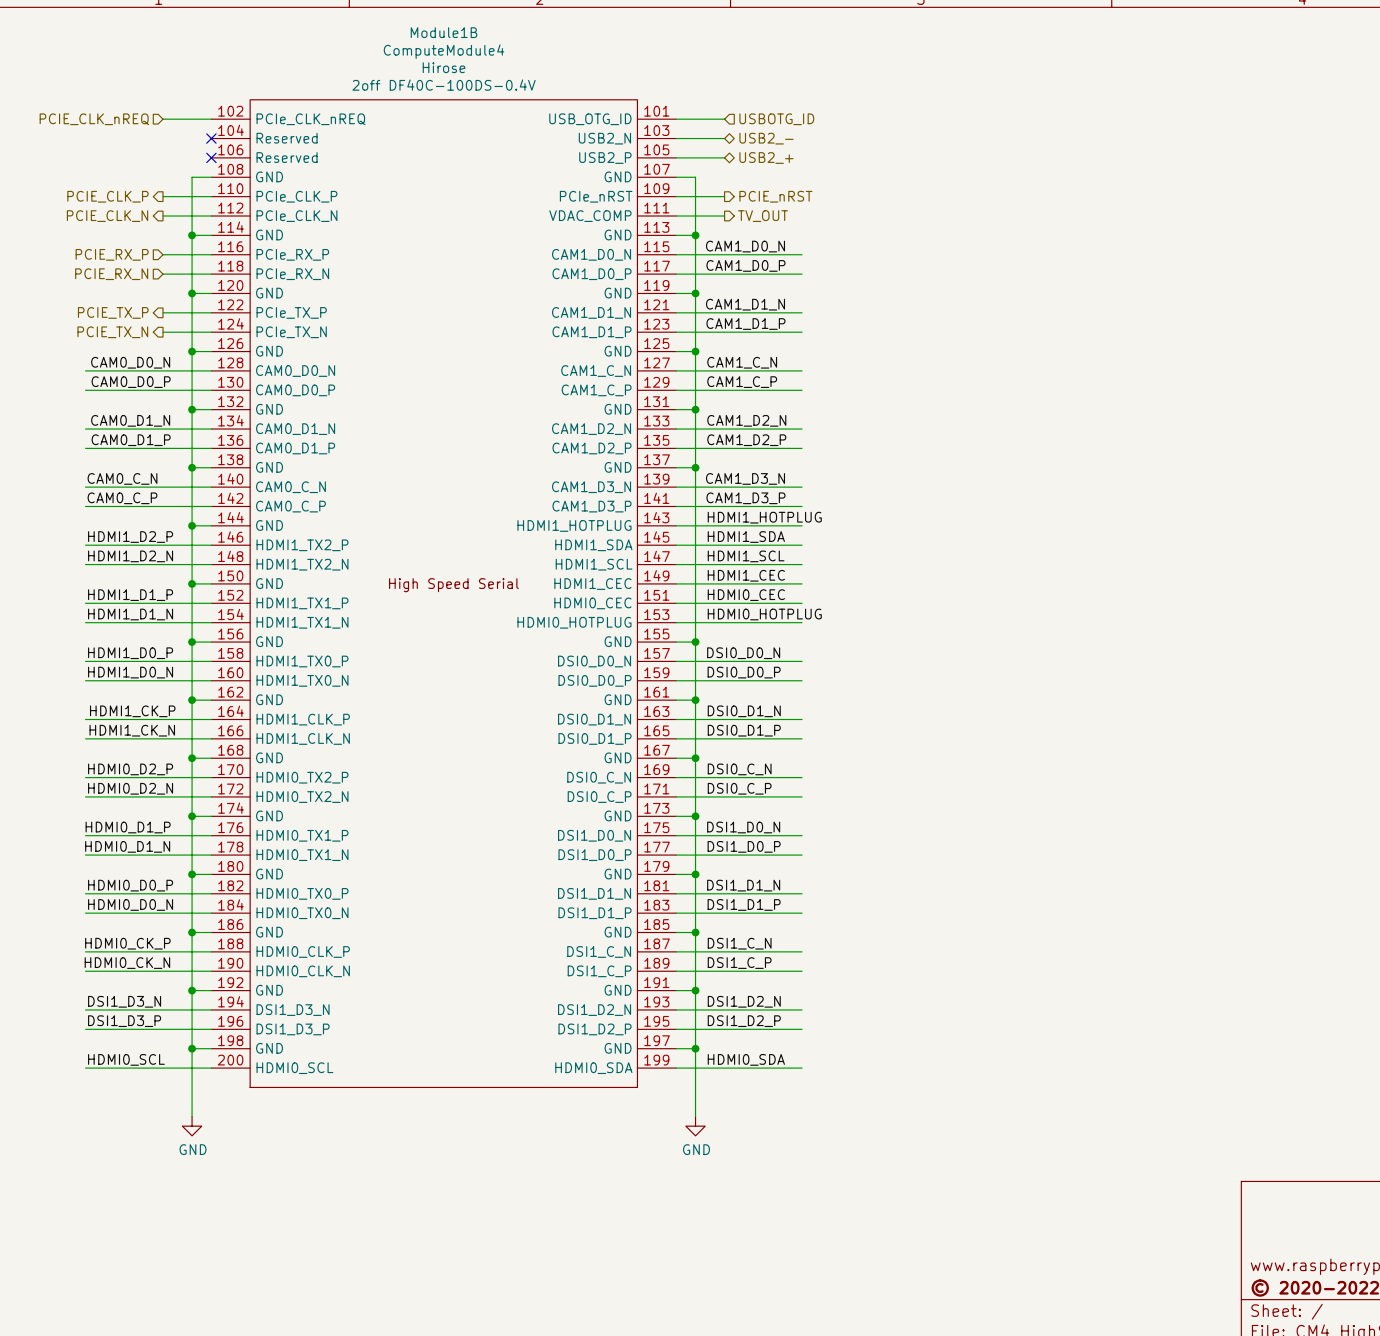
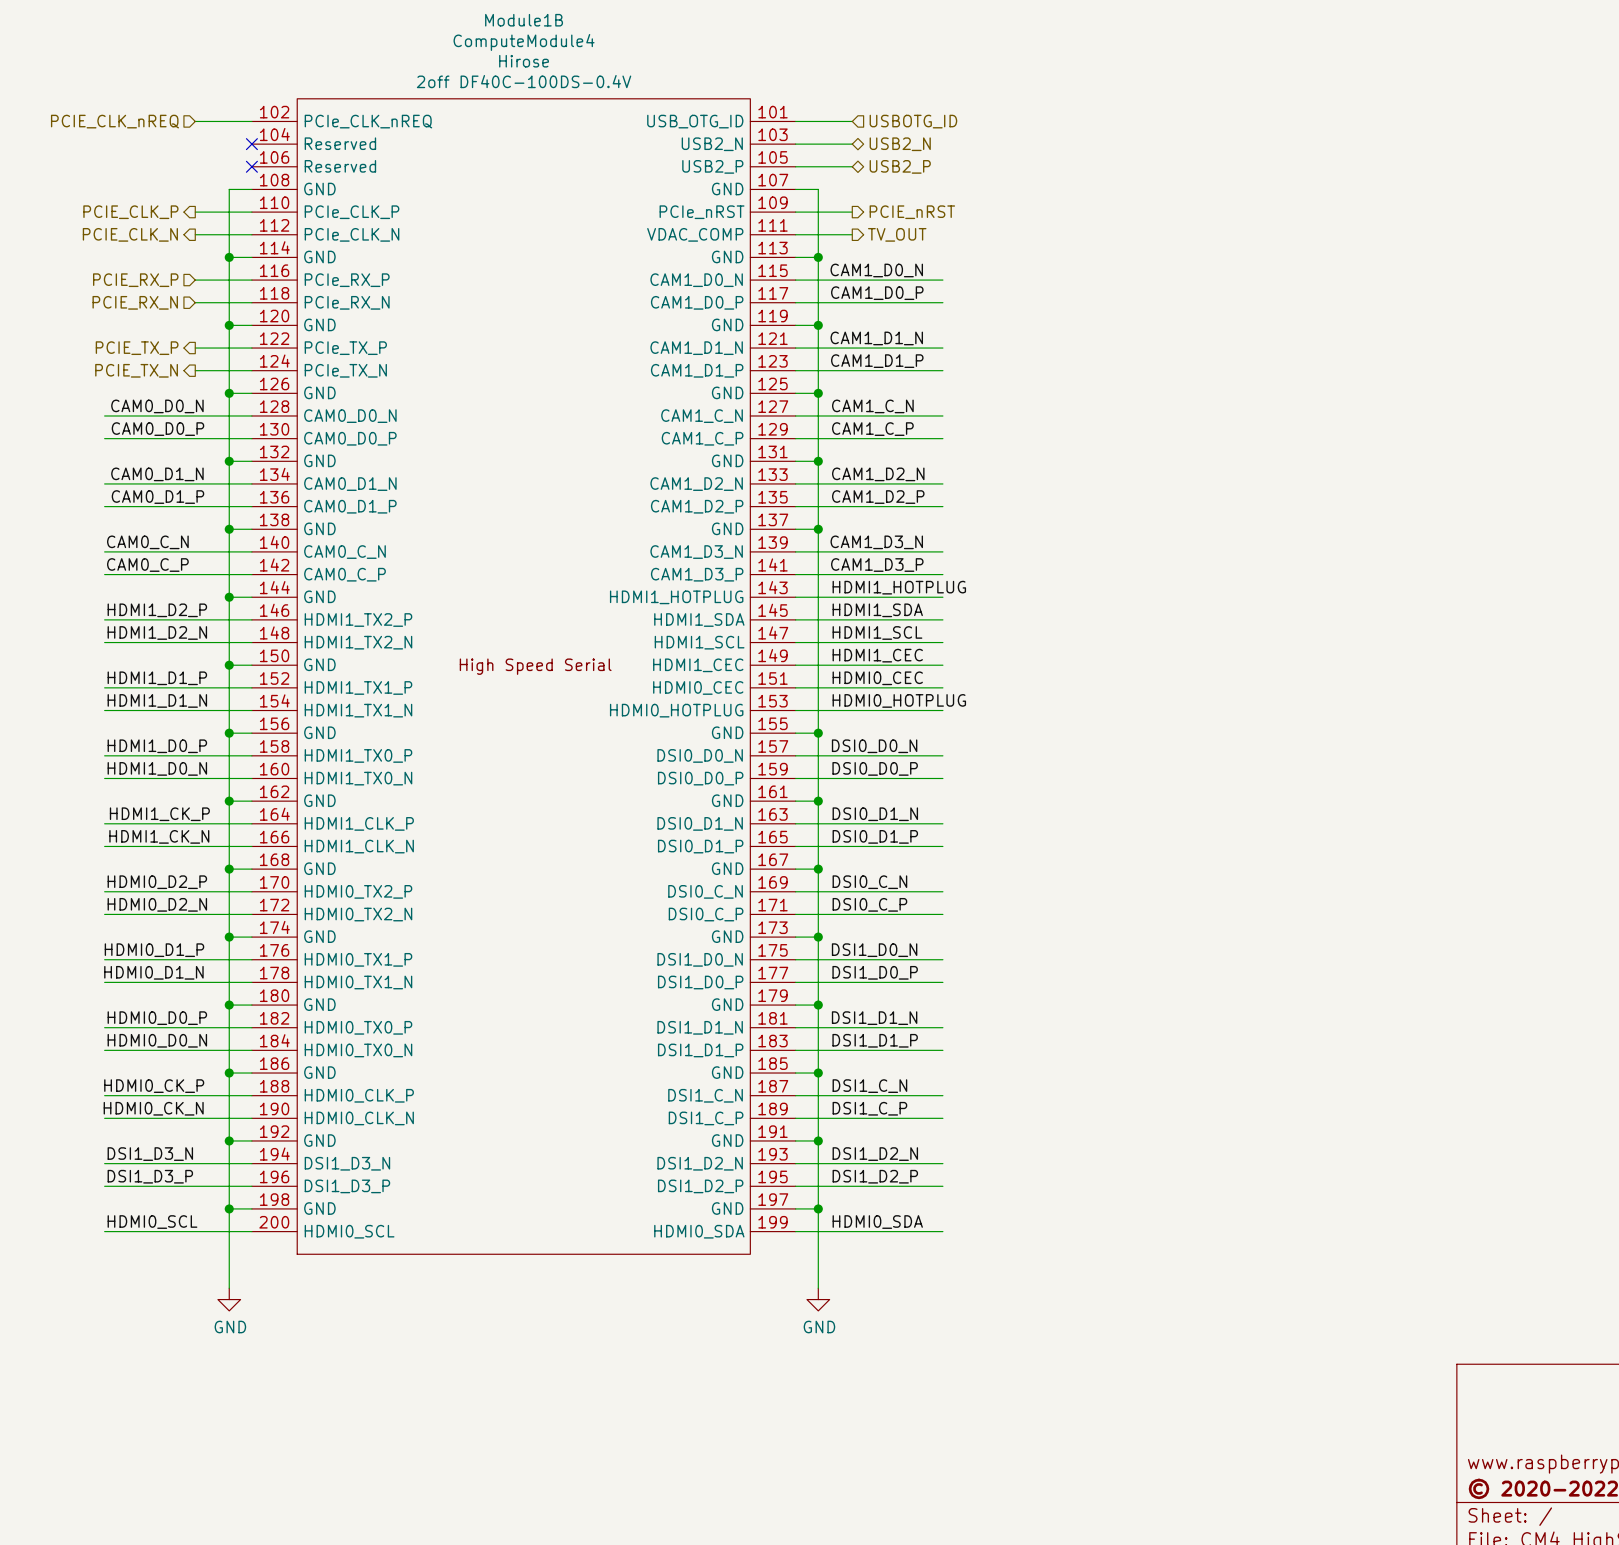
hierarchical label: USB2_- (766, 138) -> USB2_N (900, 144)
hierarchical label: USB2_+ (766, 158) -> USB2_P (900, 166)

